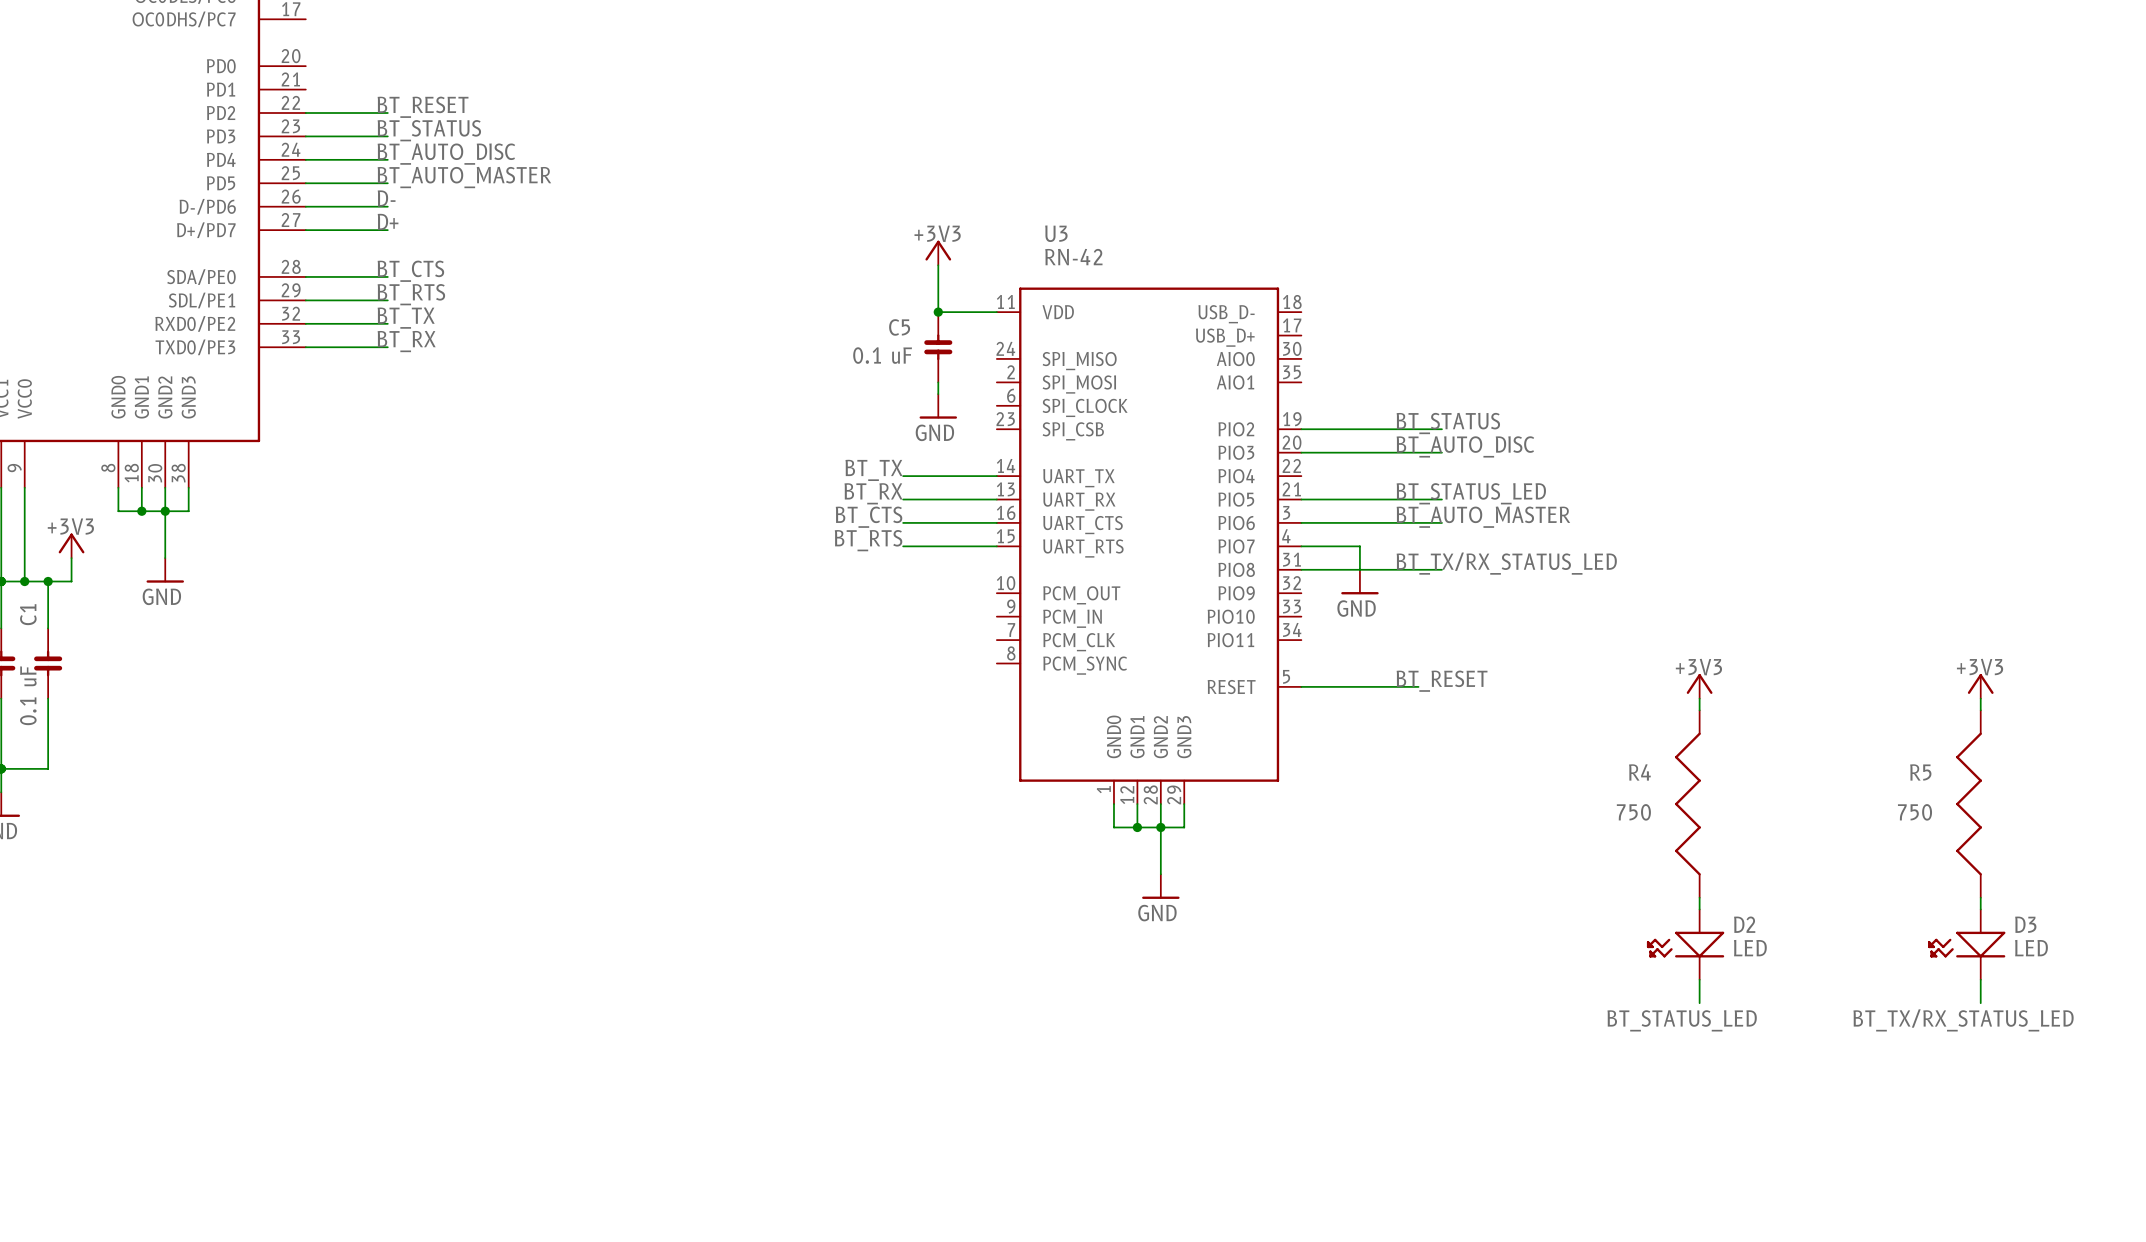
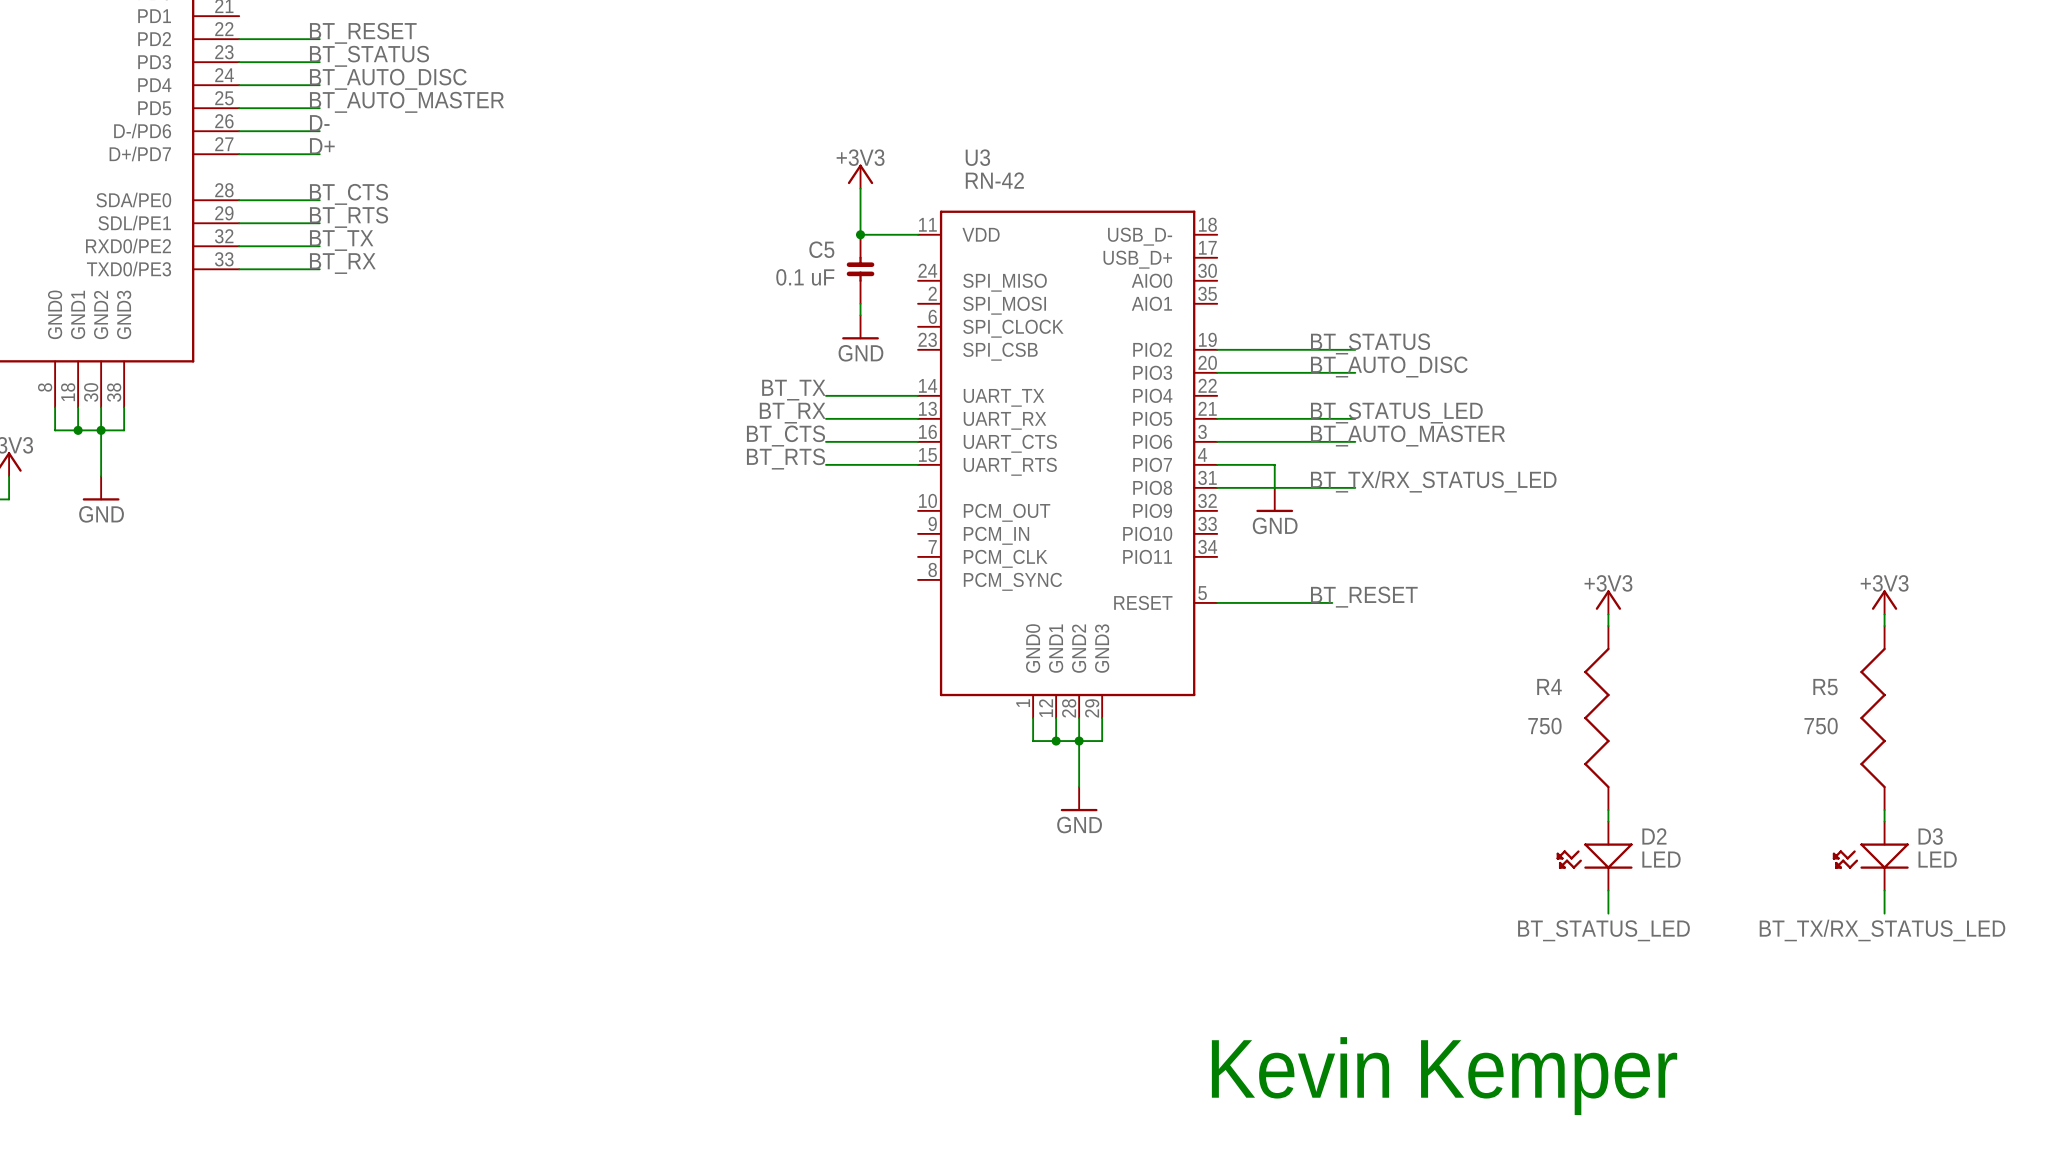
text: none -> Kevin Kemper (1444, 1076)

